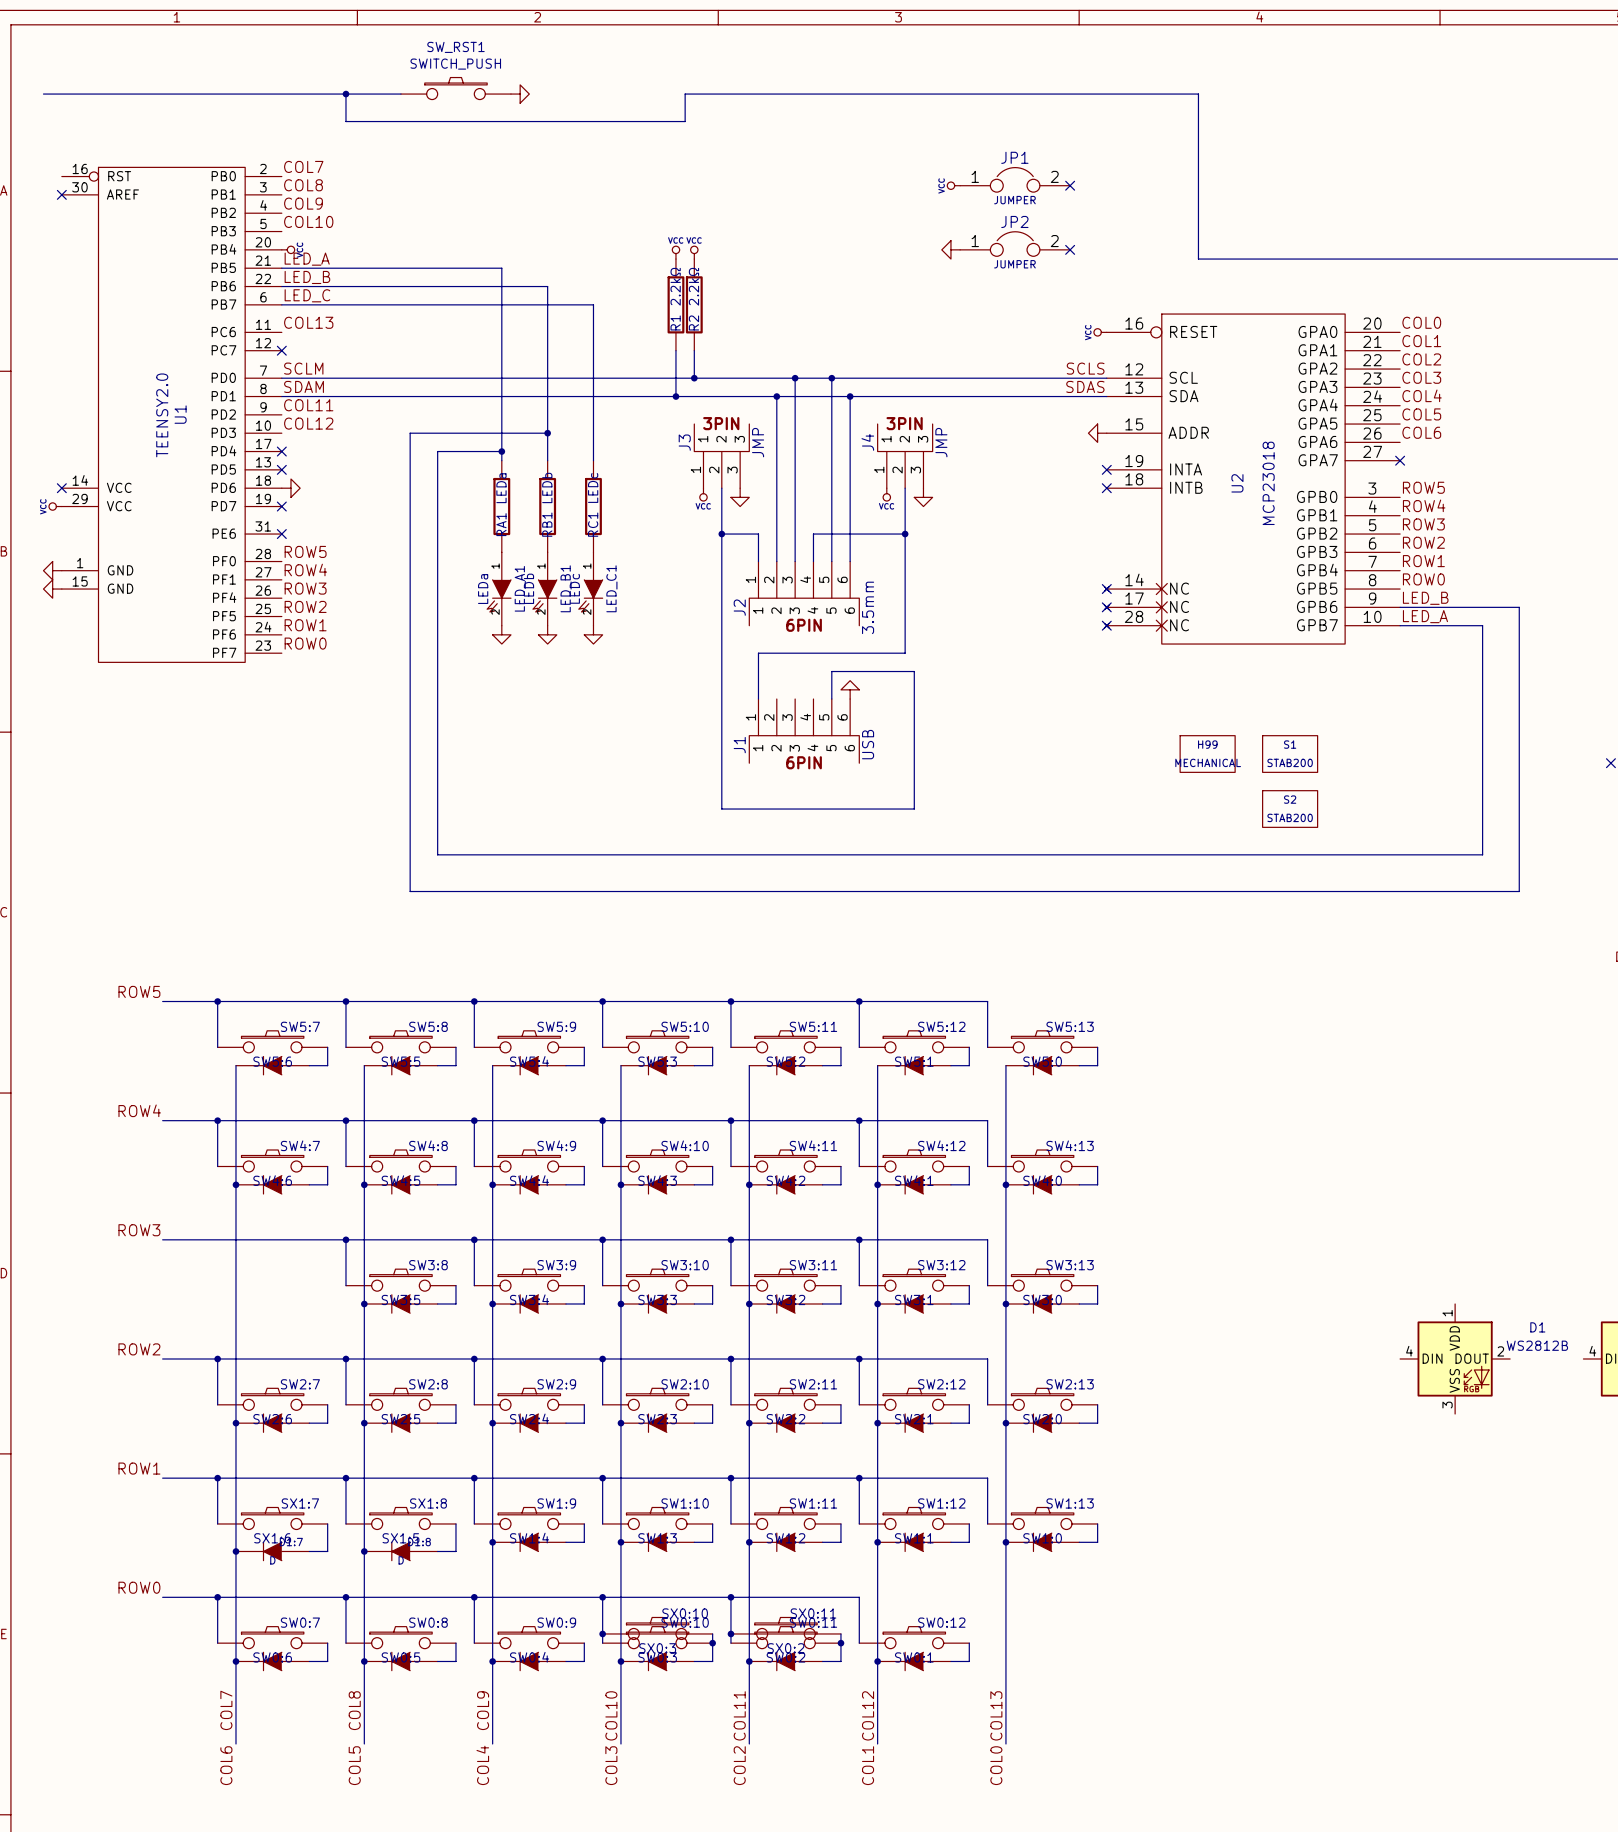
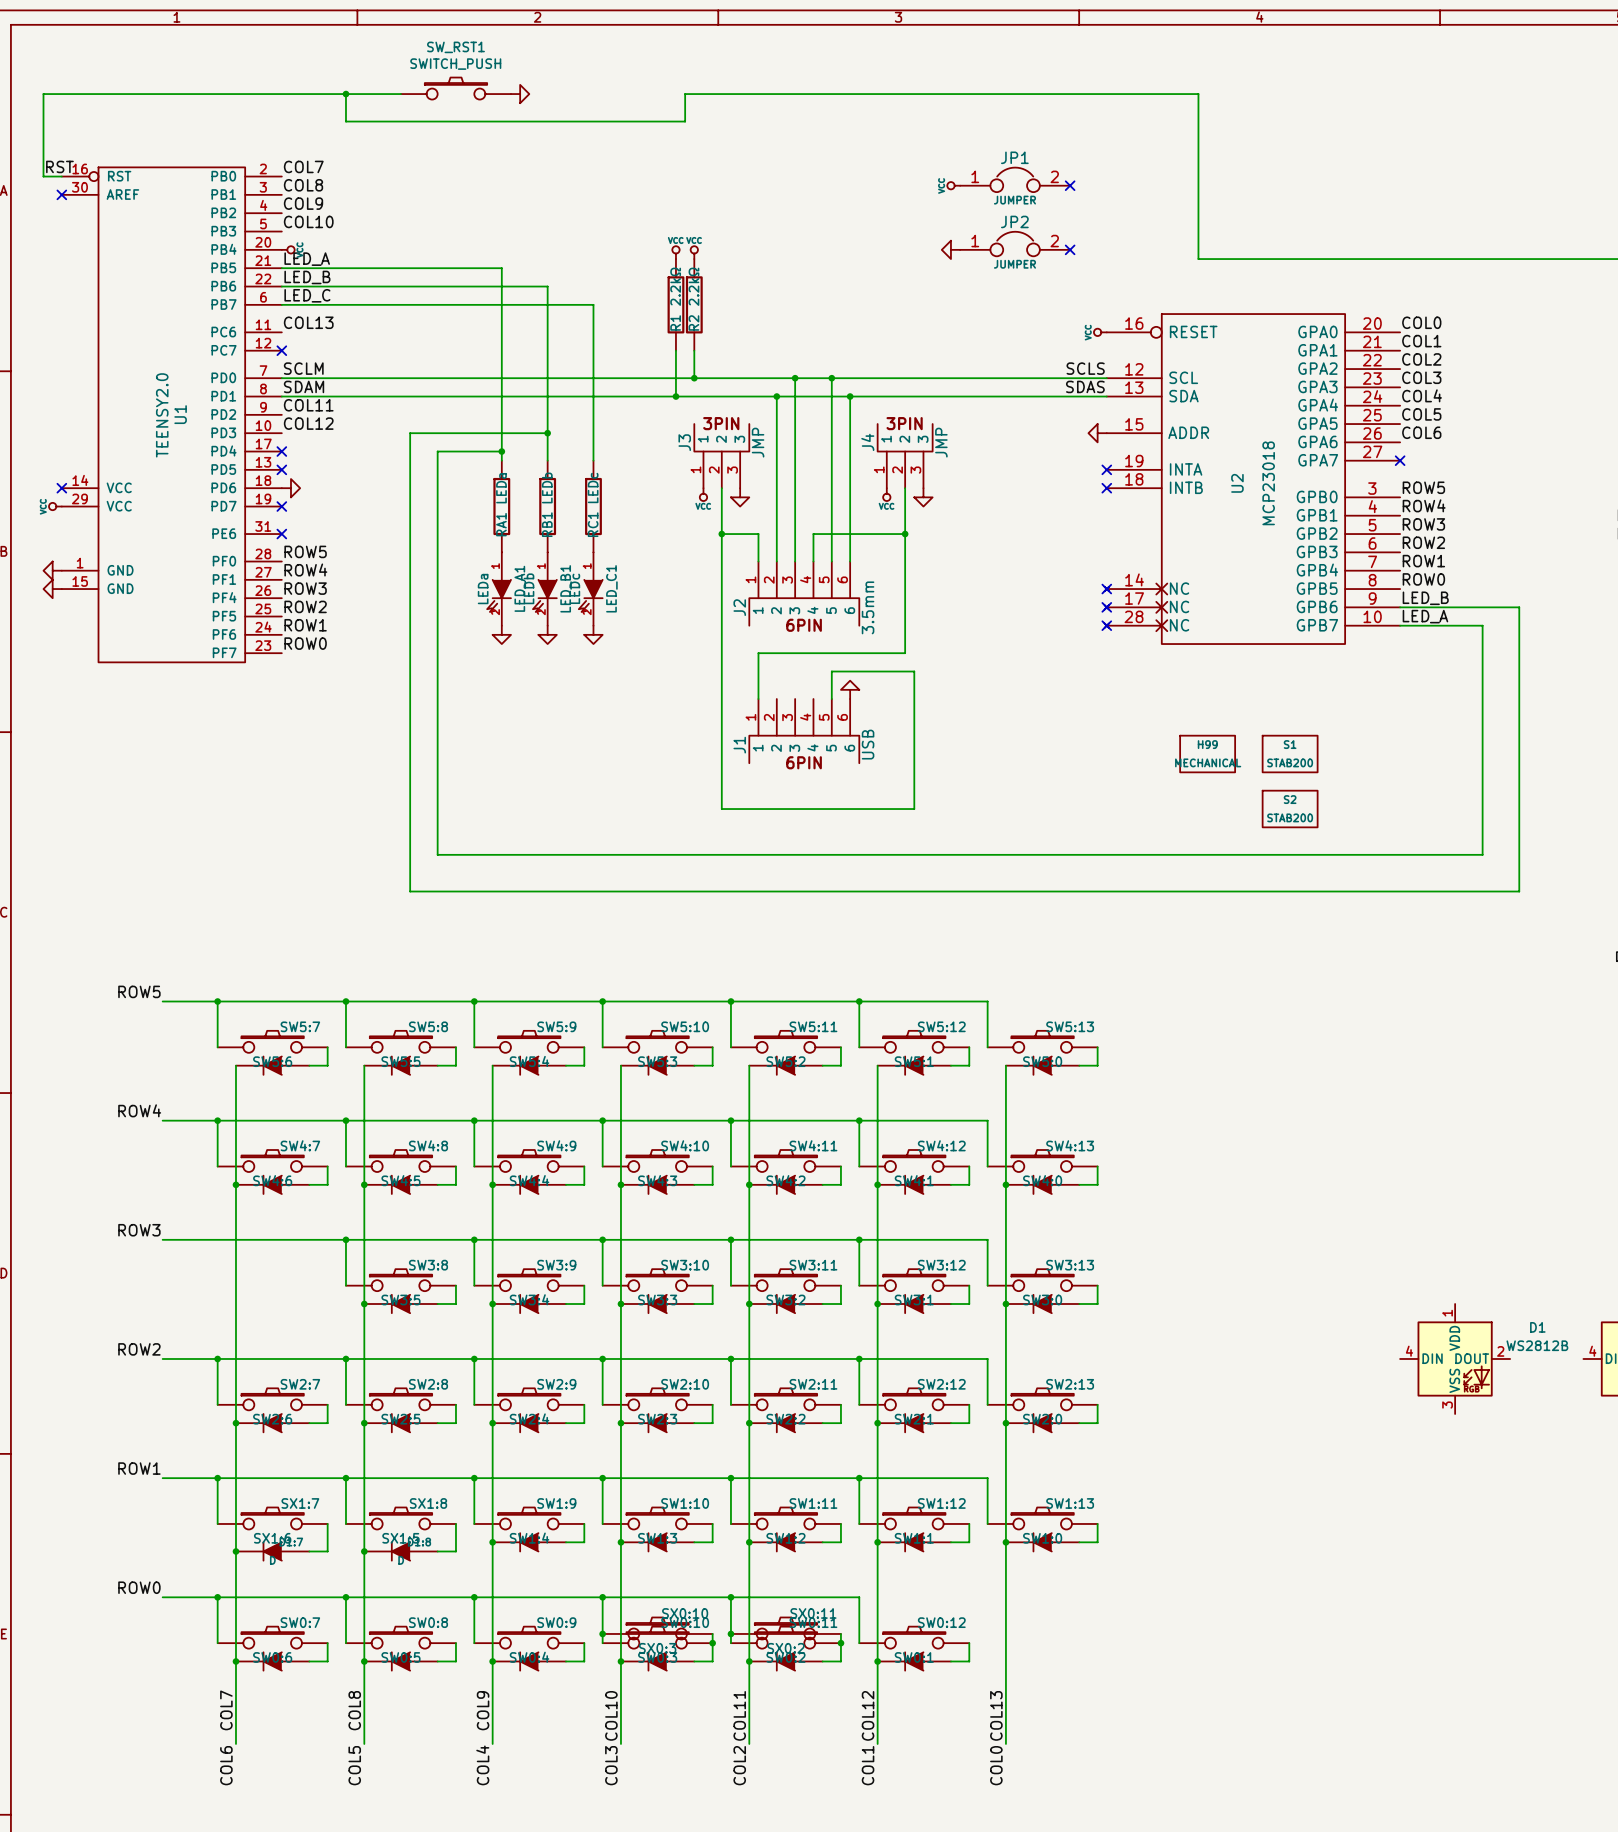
wire: none -> (43, 94) (43, 176) (61, 176)
label: none -> RST (59, 166)
no-connect mark: (1610, 763) -> none

